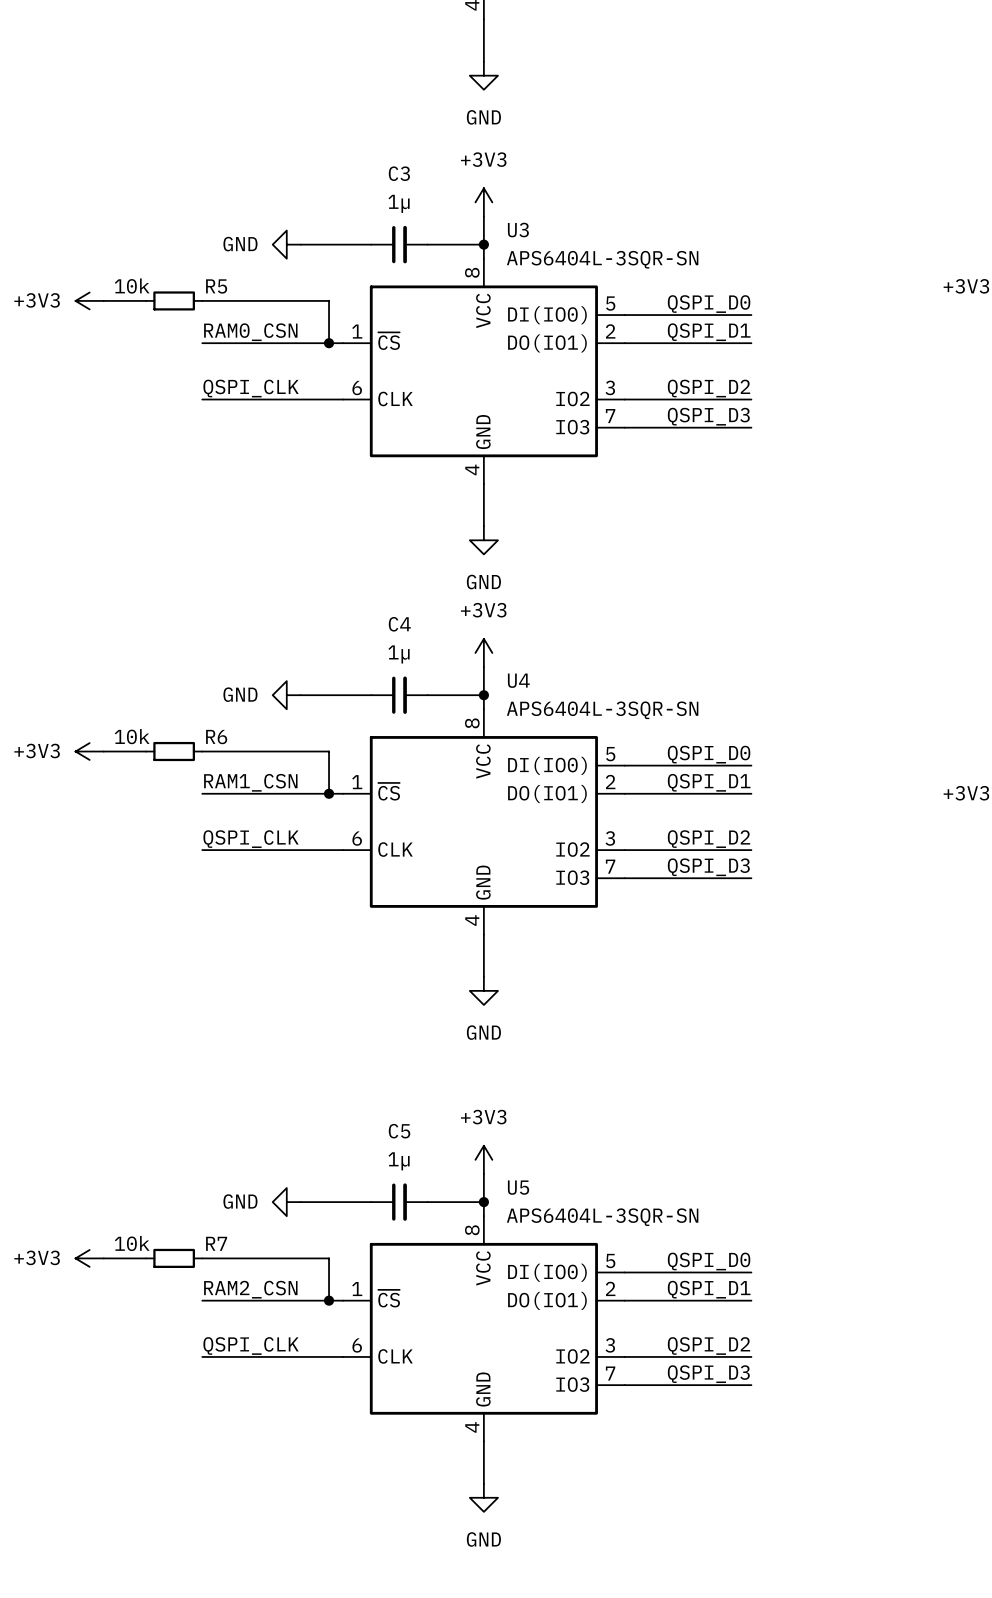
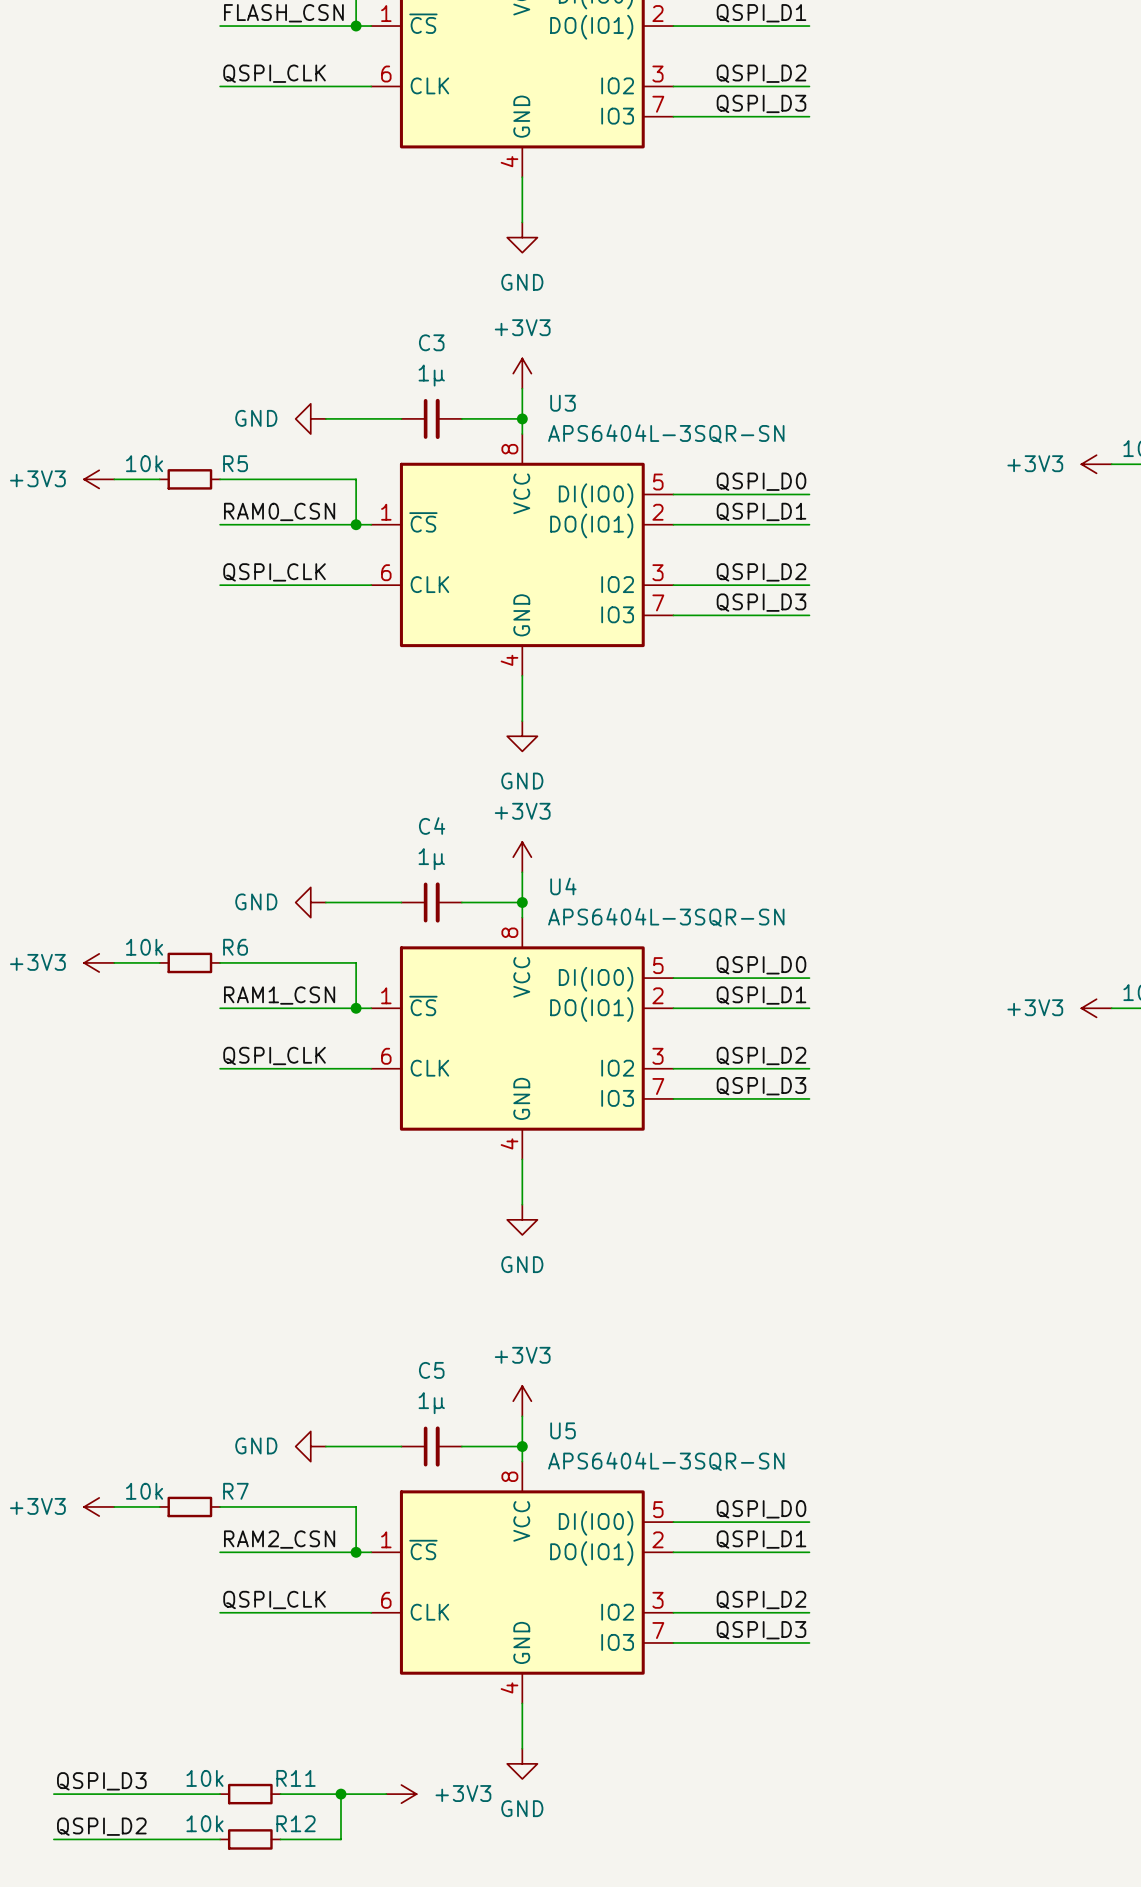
label: none -> QSPI_D3 (101, 1781)
wire: none -> (53, 1794) (220, 1794)
R11: none -> 10k (250, 1794)
wire: none -> (280, 1794) (386, 1794)
wire: none -> (340, 1794) (340, 1839) (280, 1839)
junction: none -> (340, 1794)
power symbol: none -> +3V3 (401, 1794)
label: none -> QSPI_D2 (101, 1826)
wire: none -> (53, 1839) (220, 1839)
R12: none -> 10k (250, 1839)

